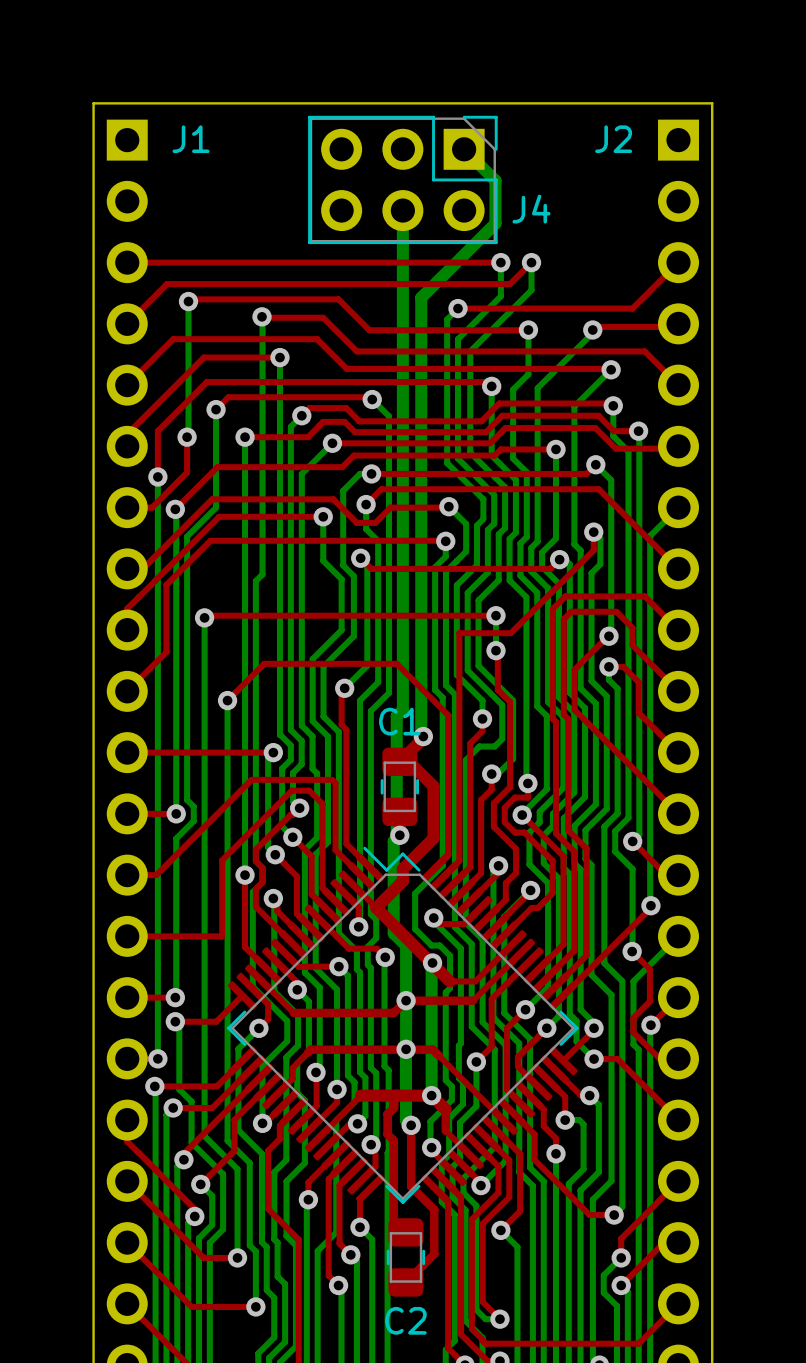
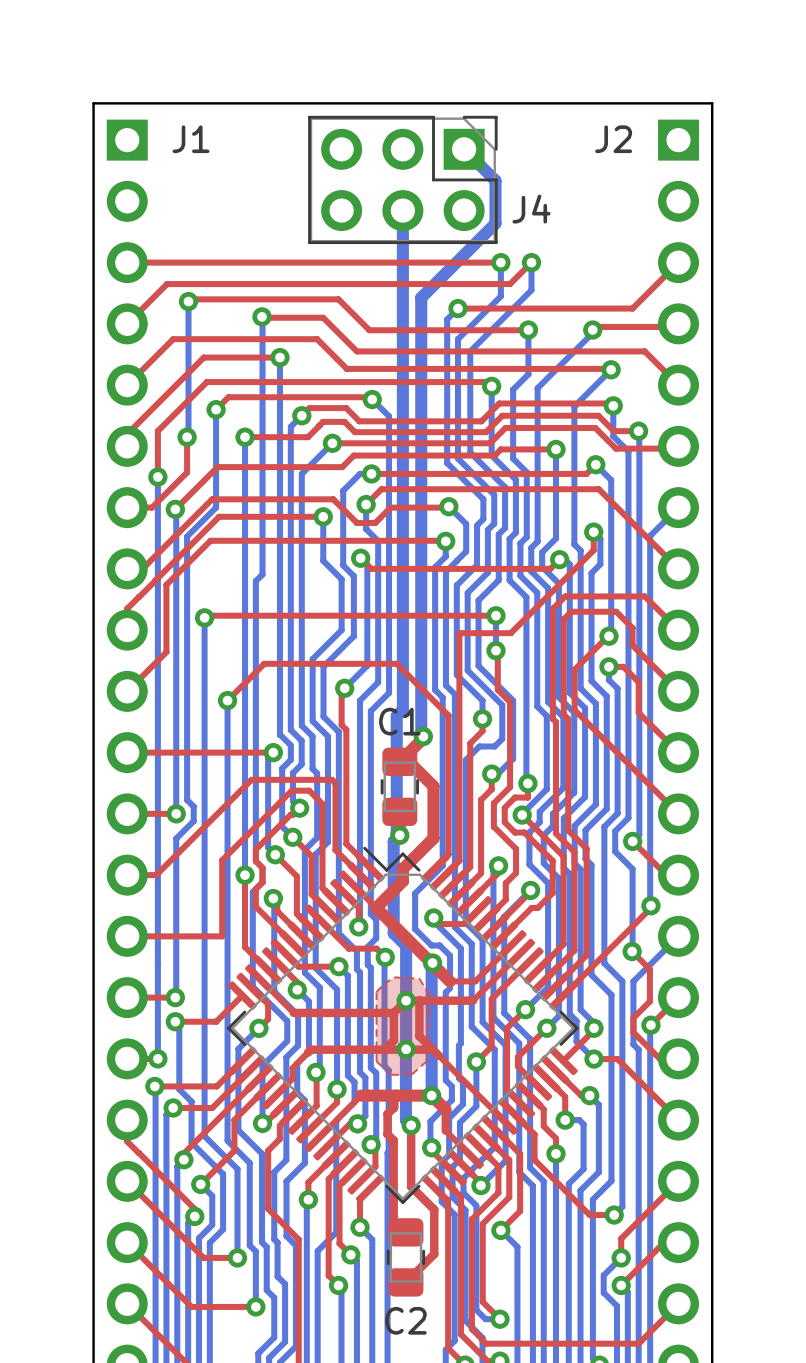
top zone outline: none -> (394, 977) (419, 978) (430, 997) (426, 1061) (411, 1074) (390, 1074) (376, 1061) (376, 992) (394, 977)
top track: none -> (419, 1000) (419, 1036) (432, 1049)
top track: none -> (393, 1012) (393, 1040) (384, 1049)

